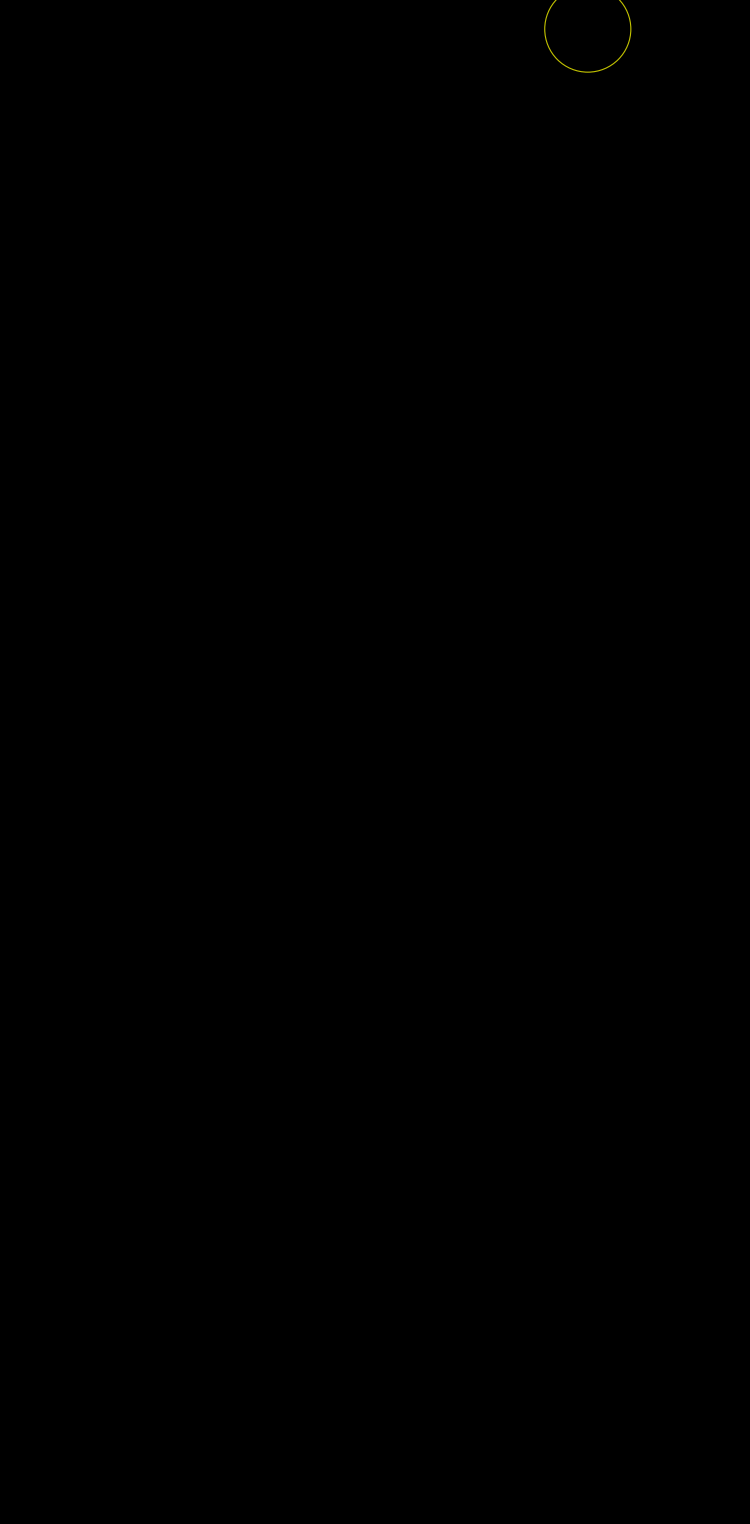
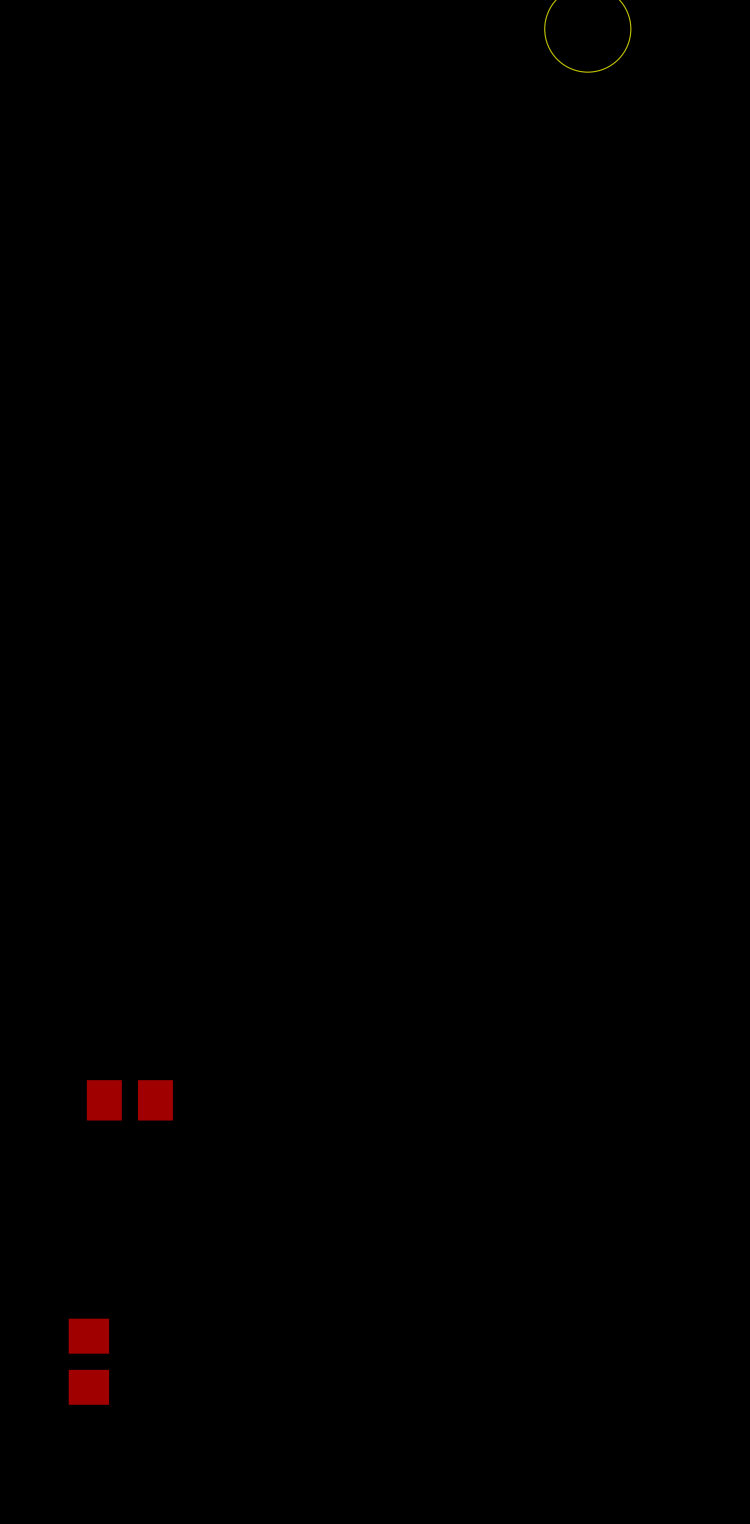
part: none -> (129, 1100)
part: none -> (88, 1361)

